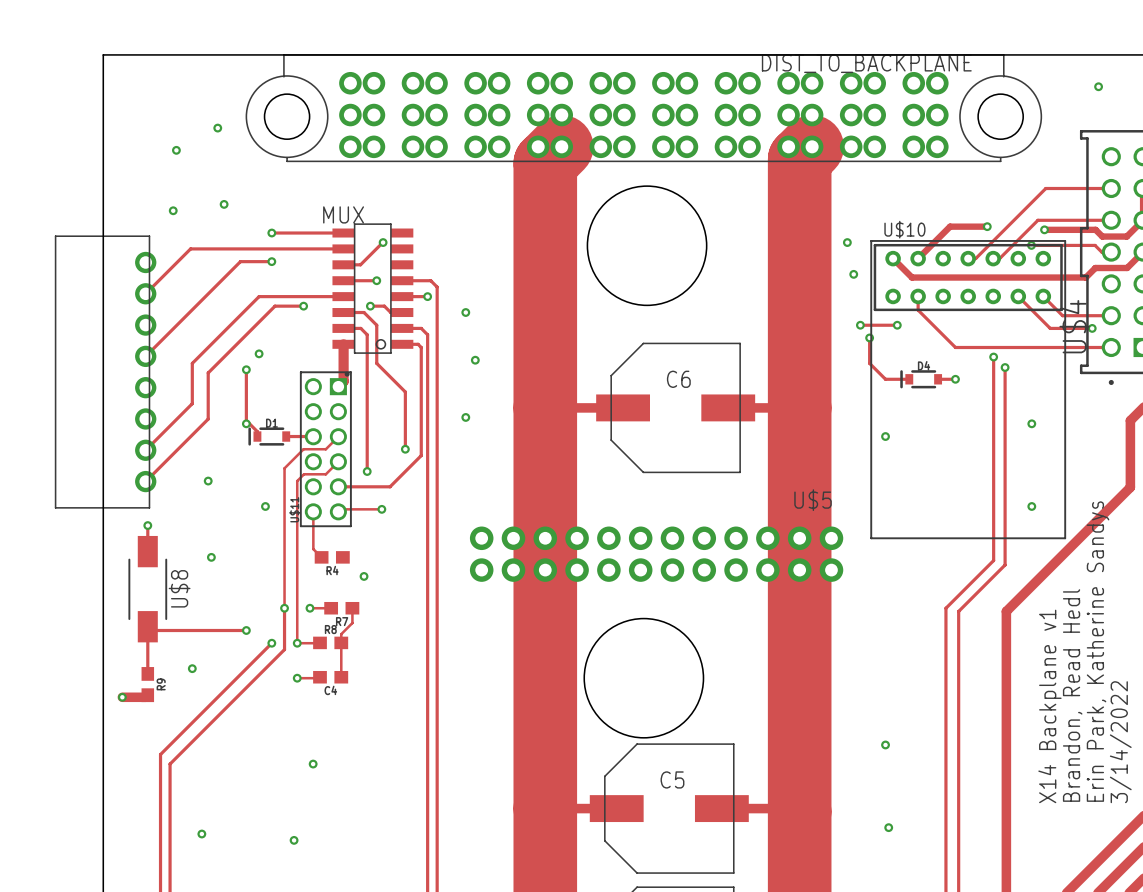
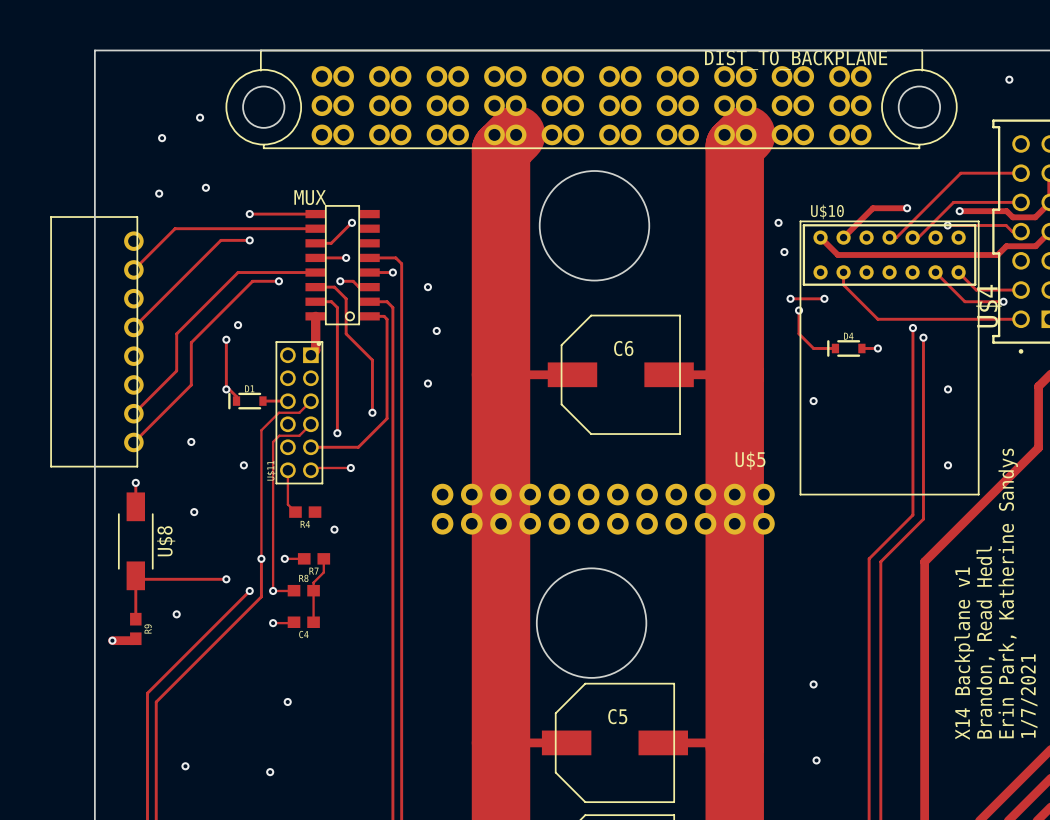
text: 3/14/2022 (1120, 742) -> 1/7/2021 (1029, 696)

